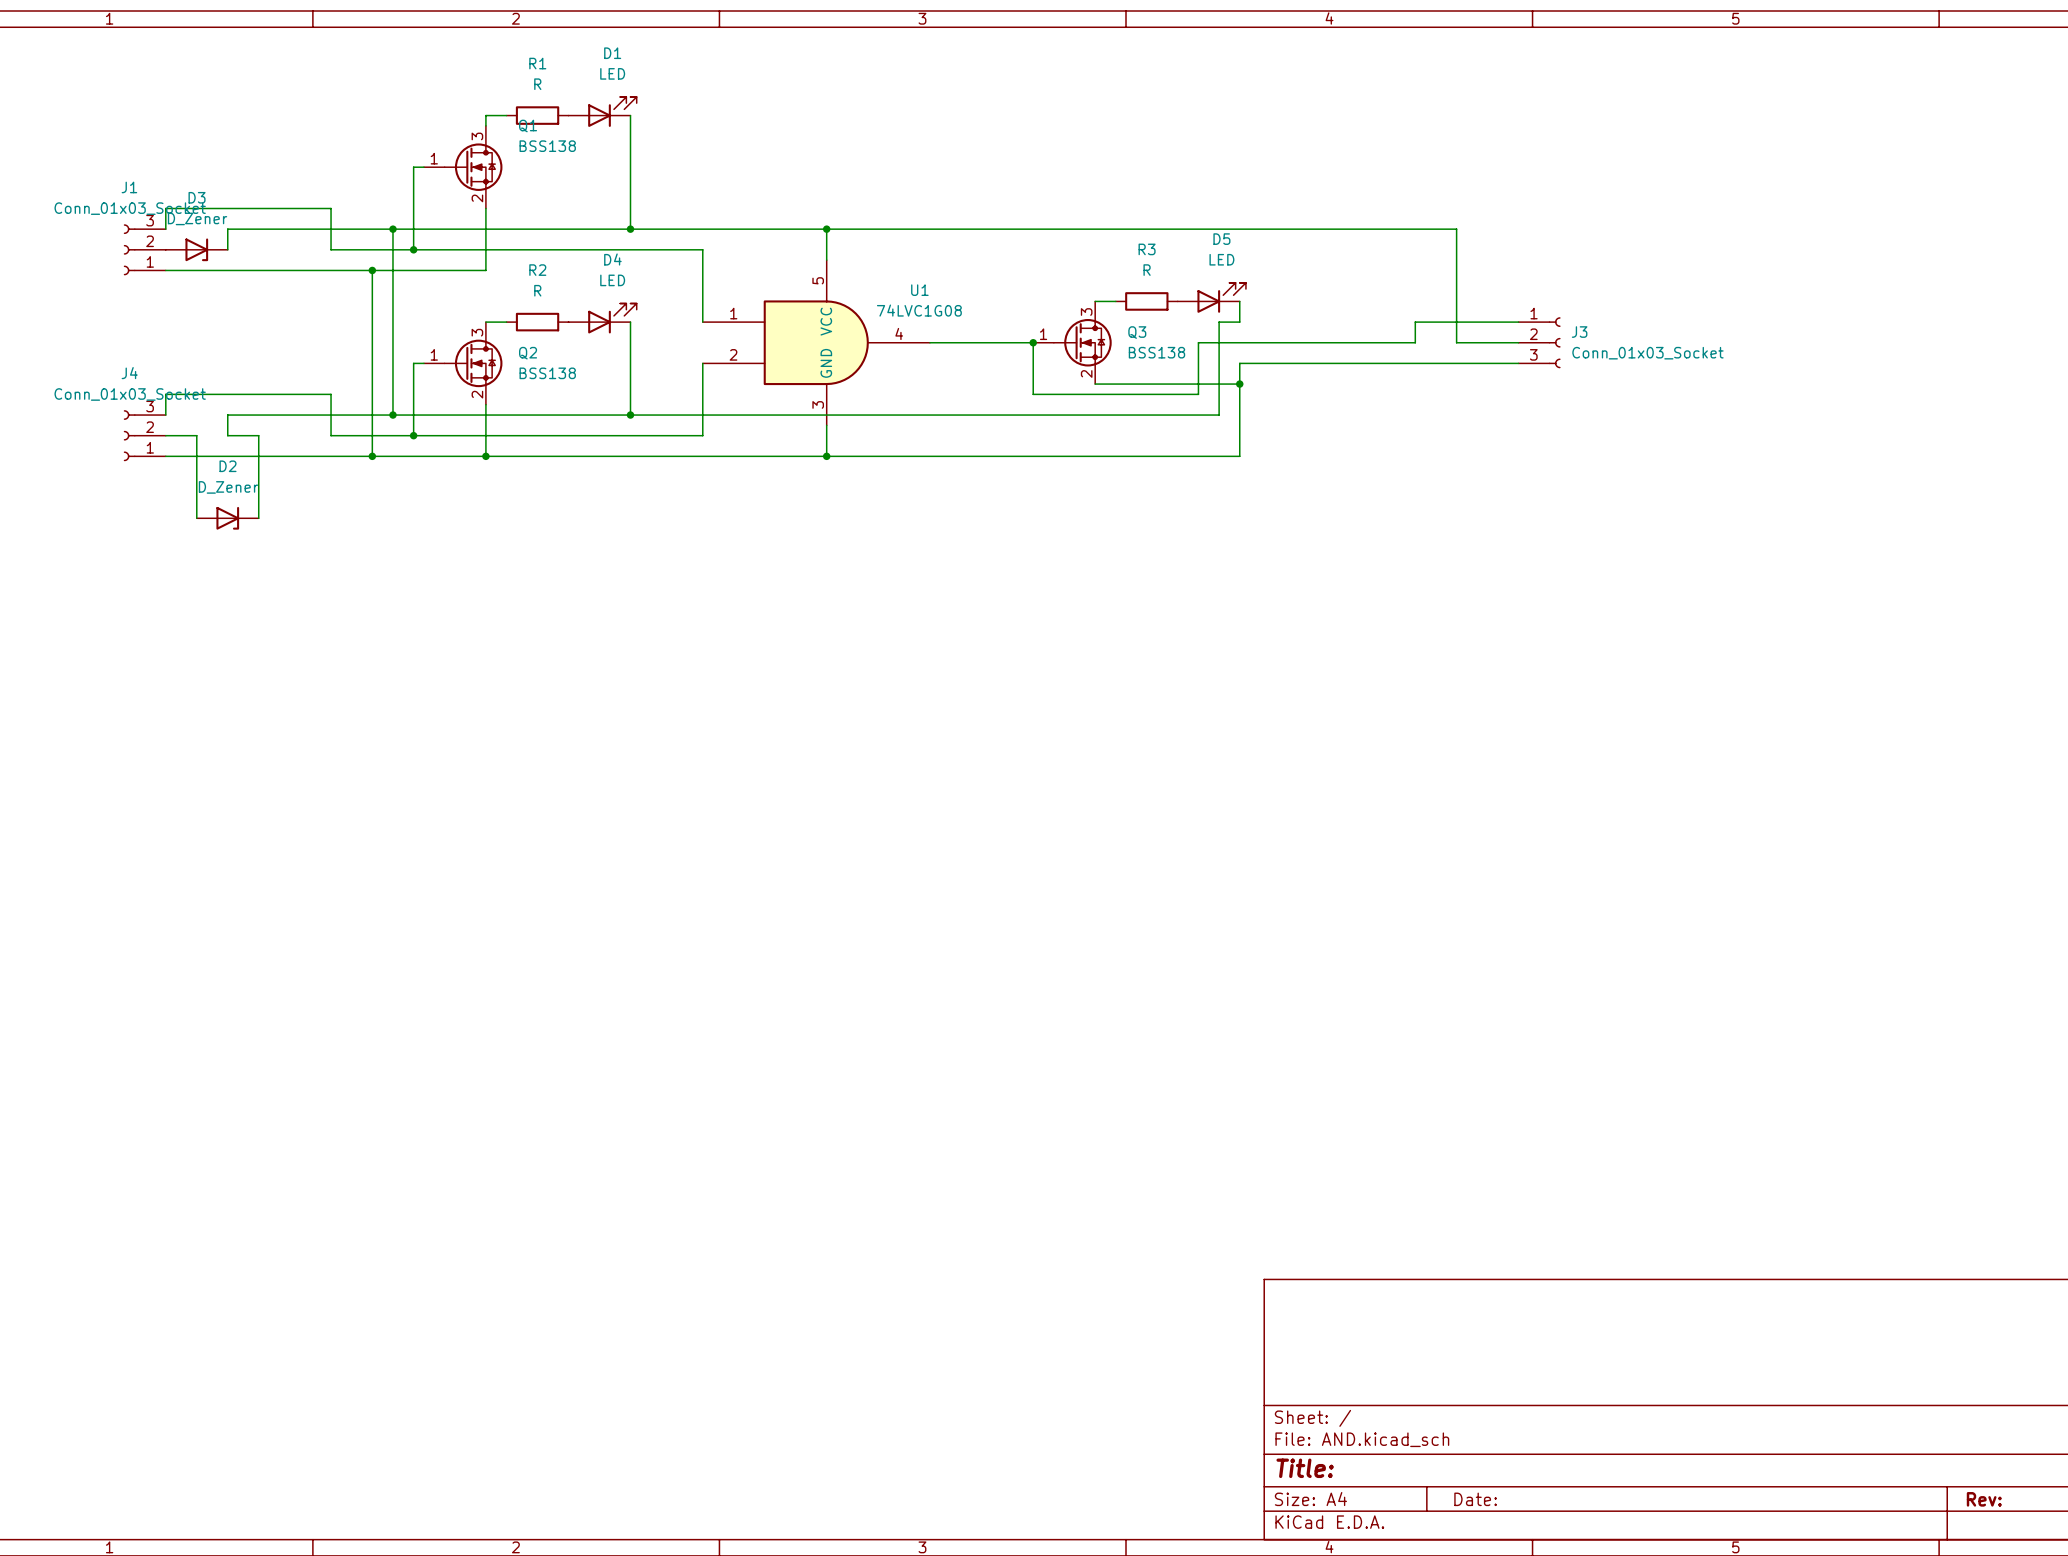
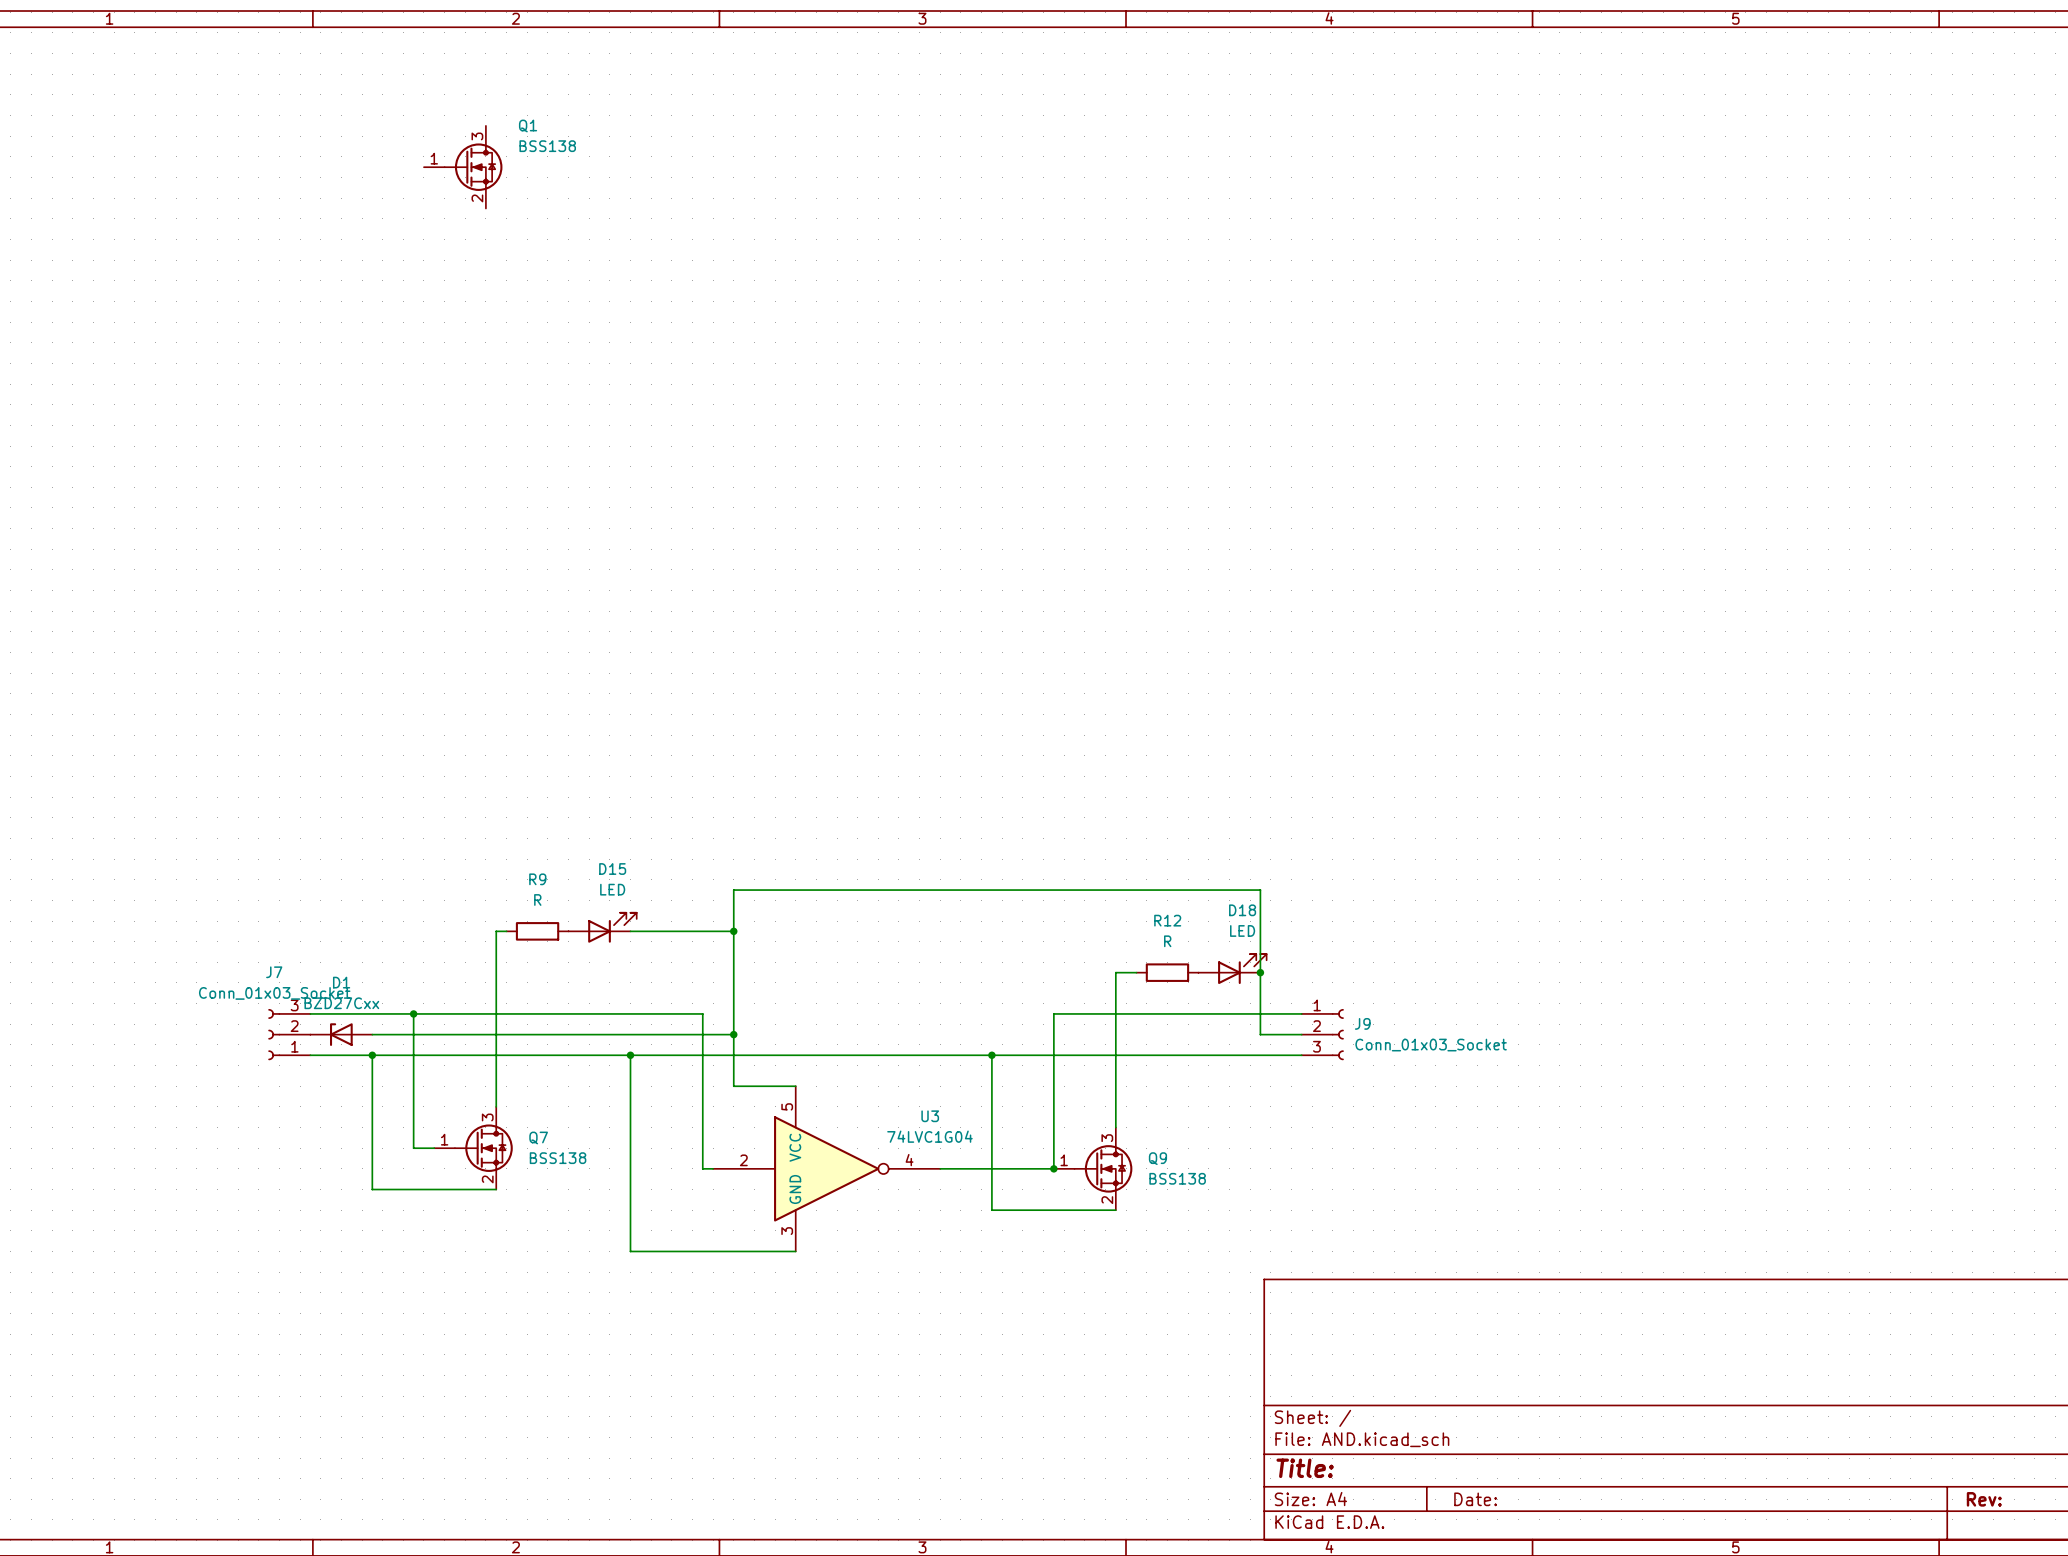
D1 value: LED (612, 73) -> BZD27Cxx (341, 1003)
D1 symbol: [568, 96, 637, 127] -> [310, 1023, 373, 1046]
wire: (506, 115) (485, 115) (485, 125) -> none
R1: R (537, 115) -> none
wire: (630, 115) (630, 229) -> none
wire: (423, 167) (413, 167) (413, 249) -> none
wire: (485, 208) (485, 270) (165, 270) -> none
wire: (165, 229) (165, 208) (331, 208) (331, 249) (702, 249) (702, 322) -> none
wire: (392, 229) (392, 415) -> none
junction: (392, 229) -> none
junction: (630, 229) -> none
wire: (826, 229) (826, 260) -> none
junction: (826, 229) -> none
J1: Conn_01x03_Socket (144, 249) -> none
D3: D_Zener (196, 249) -> none
wire: (227, 249) (227, 229) (1456, 229) (1456, 342) (1518, 342) -> none
junction: (413, 249) -> none
wire: (372, 270) (372, 456) -> none
junction: (372, 270) -> none
D5: LED (1211, 297) -> none
wire: (1095, 301) (1115, 301) -> none
R3: R (1146, 301) -> none
wire: (1239, 301) (1239, 322) (1219, 322) (1219, 415) (227, 415) (227, 435) (258, 435) (258, 518) -> none
D4: LED (602, 318) -> none
wire: (485, 322) (506, 322) -> none
R2: R (537, 322) -> none
wire: (630, 322) (630, 415) -> none
wire: (1518, 322) (1415, 322) (1415, 342) (1198, 342) (1198, 394) (1033, 394) (1033, 342) (929, 342) -> none
U1: 74LVC1G08 (816, 342) -> none
junction: (1033, 342) -> none
Q3: BSS138 (1072, 342) -> none
J3: Conn_01x03_Socket (1539, 342) -> none
wire: (423, 363) (413, 363) (413, 435) -> none
Q2: BSS138 (463, 363) -> none
wire: (702, 363) (702, 435) (331, 435) (331, 394) (165, 394) (165, 415) -> none
wire: (1518, 363) (1239, 363) (1239, 456) (165, 456) -> none
wire: (1095, 384) (1239, 384) -> none
junction: (1239, 384) -> none
wire: (485, 404) (485, 456) -> none
junction: (392, 415) -> none
junction: (630, 415) -> none
wire: (826, 425) (826, 456) -> none
J4: Conn_01x03_Socket (144, 435) -> none
wire: (165, 435) (196, 435) (196, 518) -> none
junction: (413, 435) -> none
junction: (372, 456) -> none
junction: (485, 456) -> none
junction: (826, 456) -> none
D2: D_Zener (227, 518) -> none
D15: none -> LED (602, 927)
wire: none -> (506, 931) (496, 931) (496, 1106)
R9: none -> R (537, 931)
wire: none -> (630, 931) (733, 931)
junction: none -> (733, 931)
D18: none -> LED (1232, 969)
wire: none -> (1136, 972) (1115, 972) (1115, 1127)
R12: none -> R (1167, 972)
junction: none -> (1260, 972)
wire: none -> (310, 1013) (702, 1013) (702, 1168) (713, 1168)
wire: none -> (413, 1013) (413, 1148) (434, 1148)
junction: none -> (413, 1013)
wire: none -> (1301, 1013) (1053, 1013) (1053, 1168) (940, 1168)
J7: none -> Conn_01x03_Socket (289, 1034)
wire: none -> (372, 1034) (733, 1034)
junction: none -> (733, 1034)
wire: none -> (1301, 1034) (1260, 1034) (1260, 890) (733, 890) (733, 1086) (795, 1086)
J9: none -> Conn_01x03_Socket (1322, 1034)
wire: none -> (310, 1055) (1301, 1055)
wire: none -> (372, 1055) (372, 1189) (496, 1189)
junction: none -> (372, 1055)
wire: none -> (630, 1055) (630, 1251) (795, 1251)
junction: none -> (630, 1055)
wire: none -> (991, 1055) (991, 1210) (1115, 1210)
junction: none -> (991, 1055)
Q7: none -> BSS138 (473, 1148)
U3: none -> 74LVC1G04 (826, 1168)
junction: none -> (1053, 1168)
Q9: none -> BSS138 (1093, 1168)

